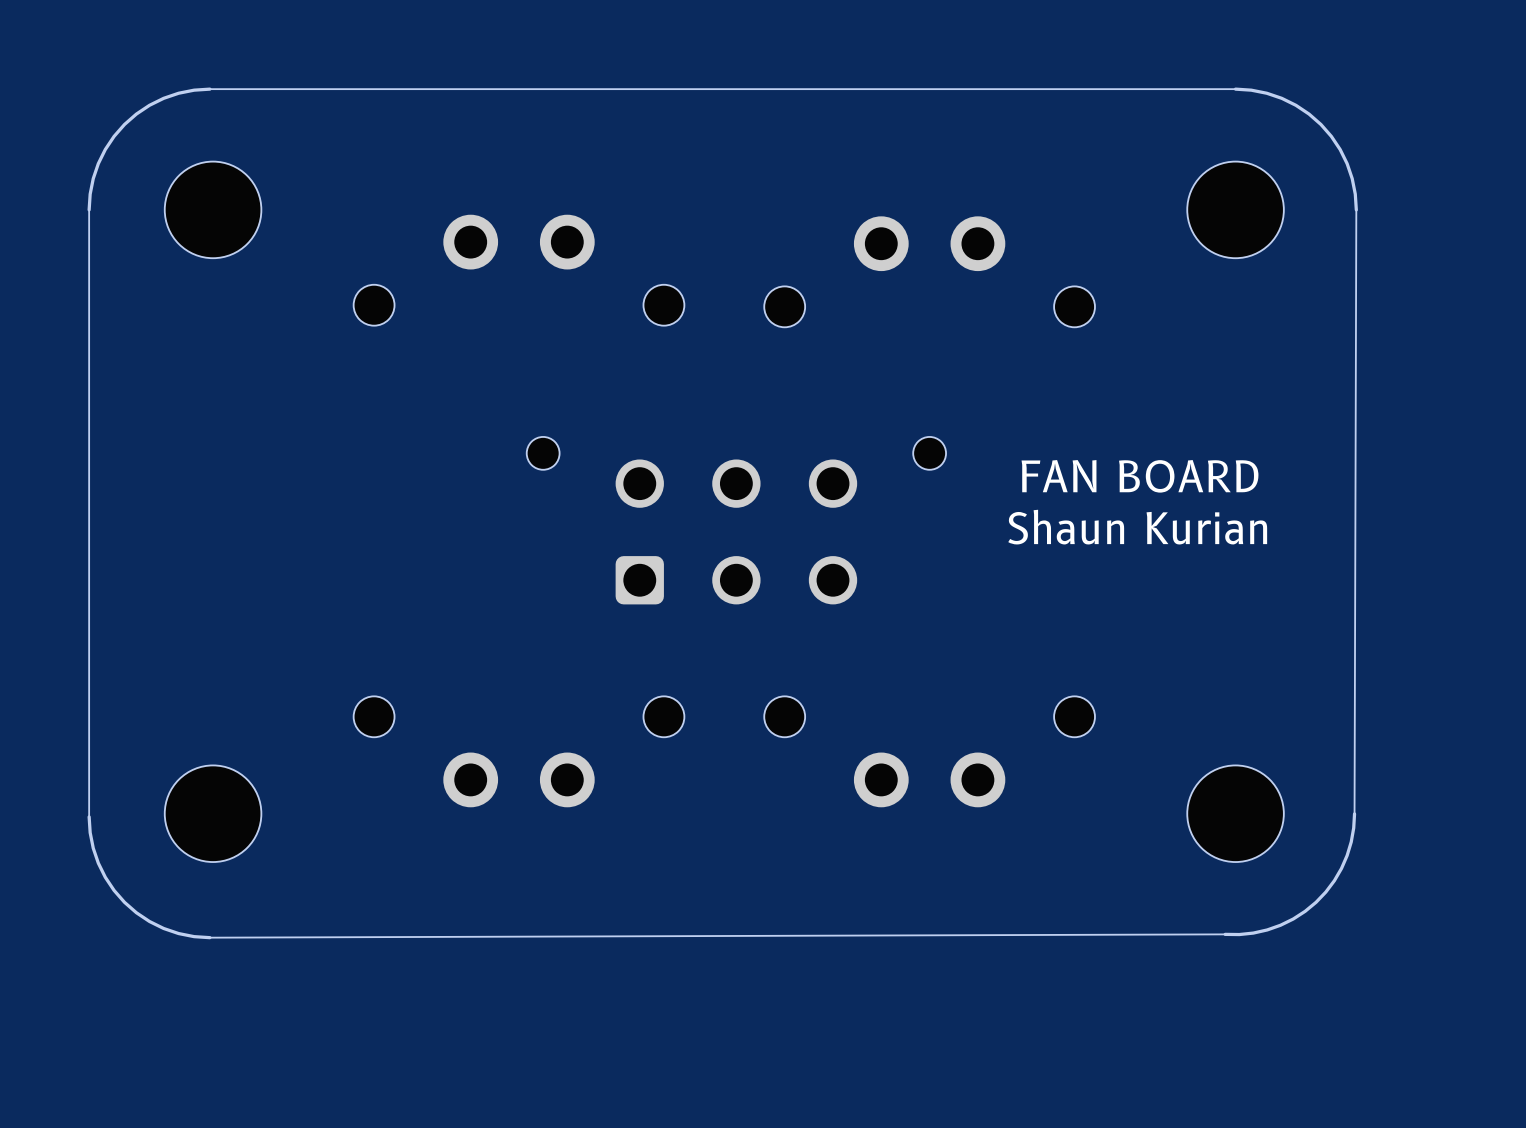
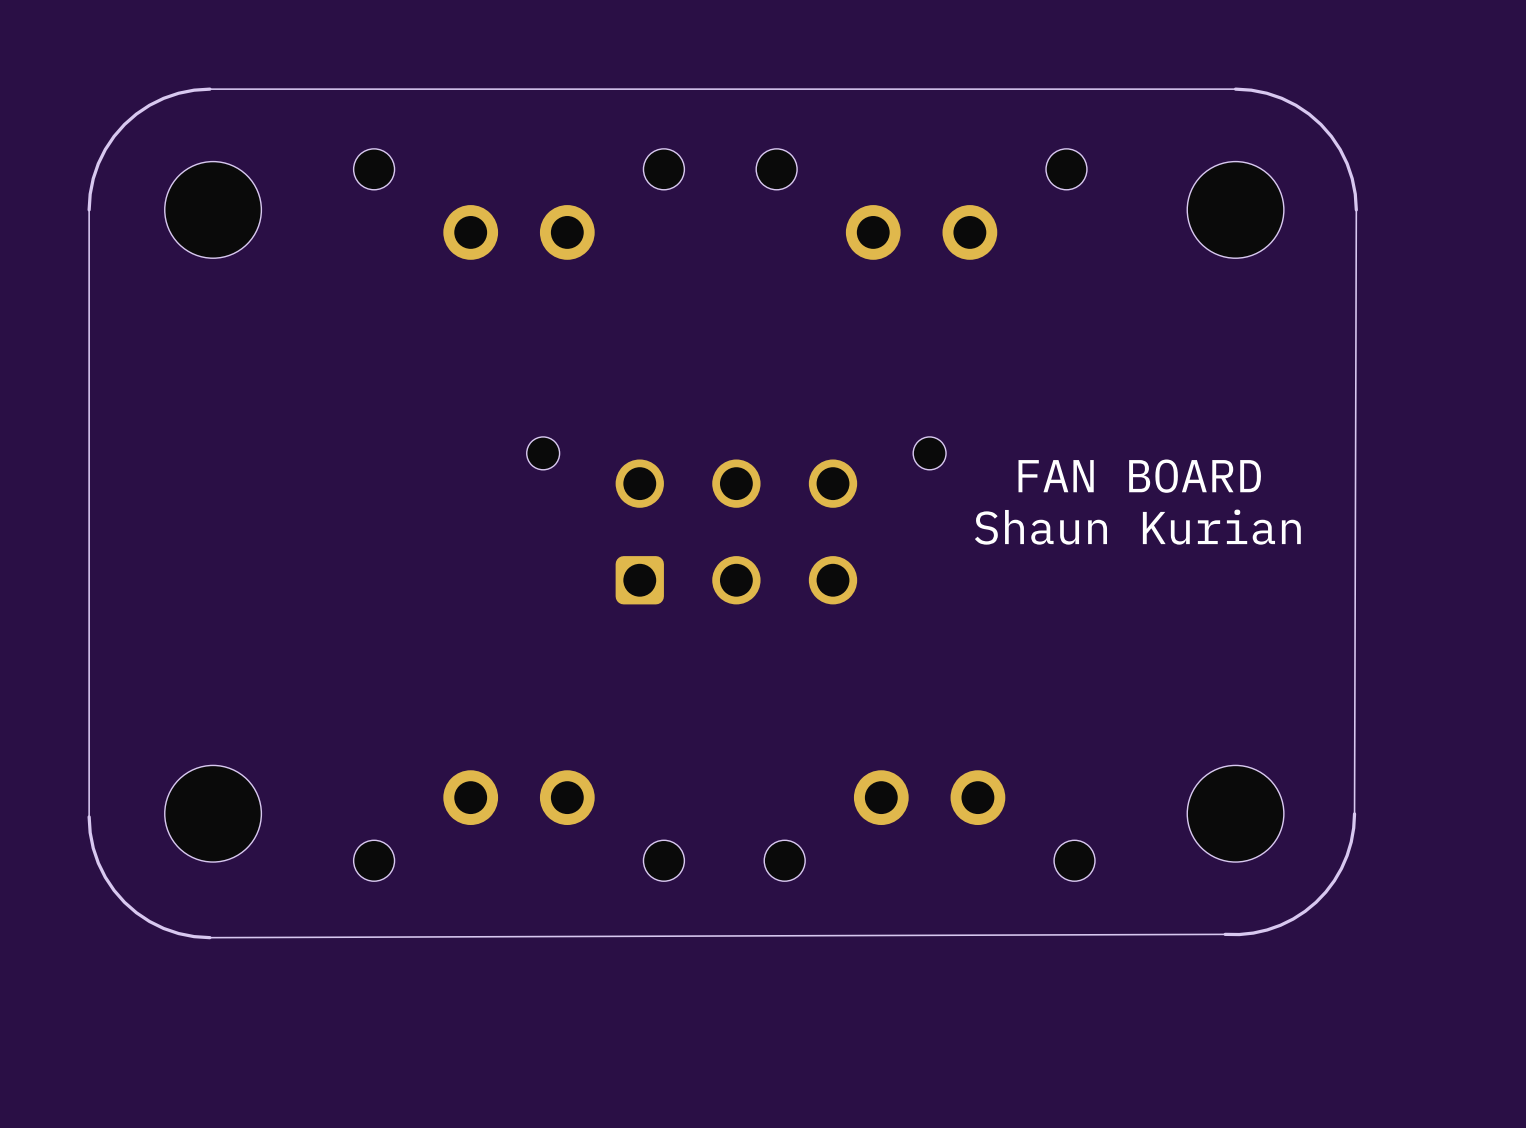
part rotation: 0° (519, 270) -> 180° (519, 204)
part rotation: 0° (929, 271) -> 180° (921, 204)
part rotation: 0° (519, 751) -> 180° (519, 825)
part rotation: 0° (929, 751) -> 180° (929, 825)

